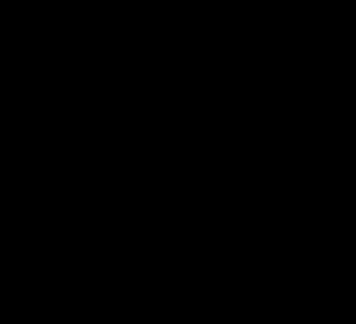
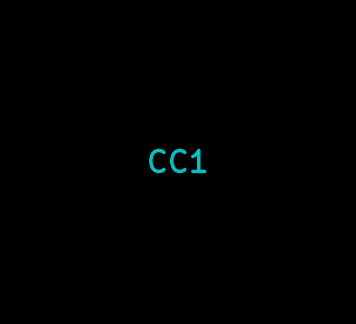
drawing: none -> [149, 148, 207, 174]

